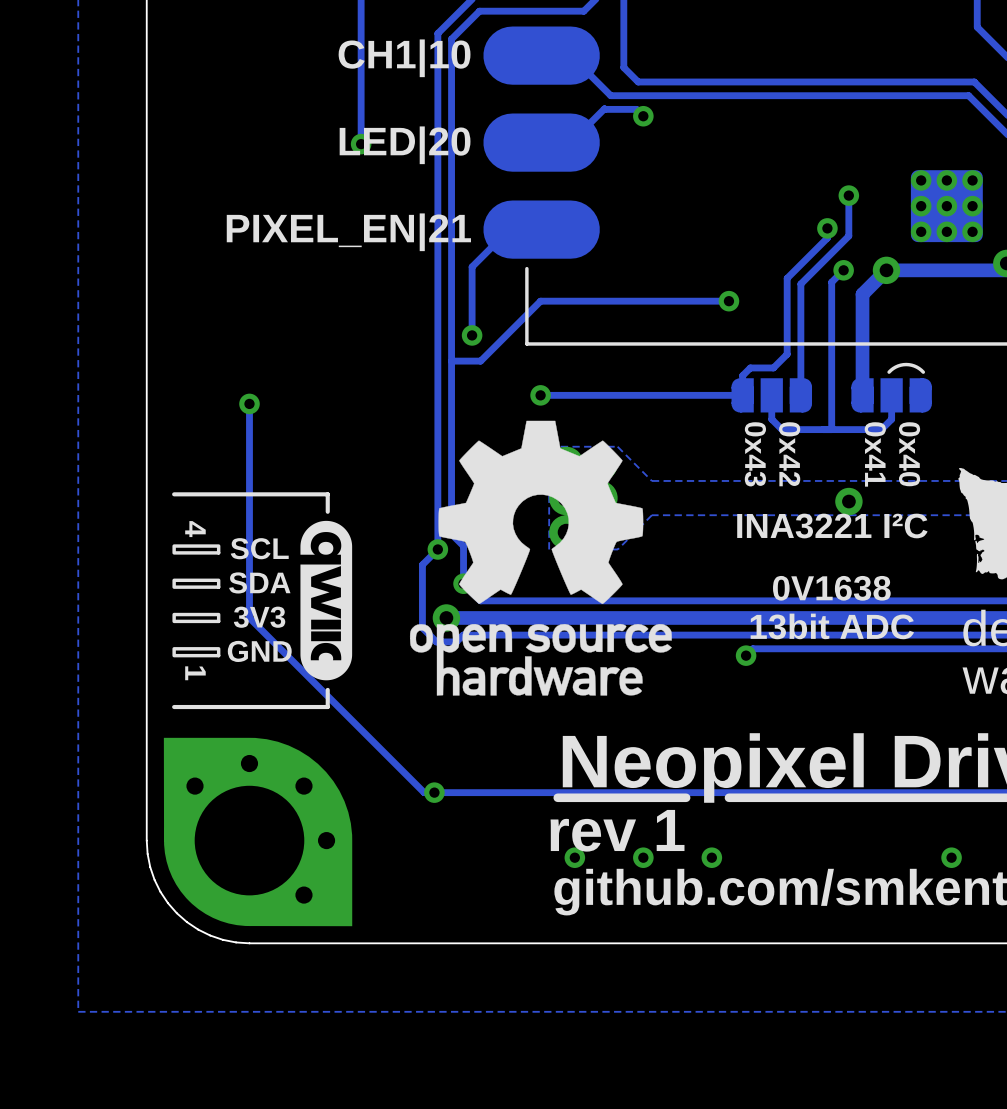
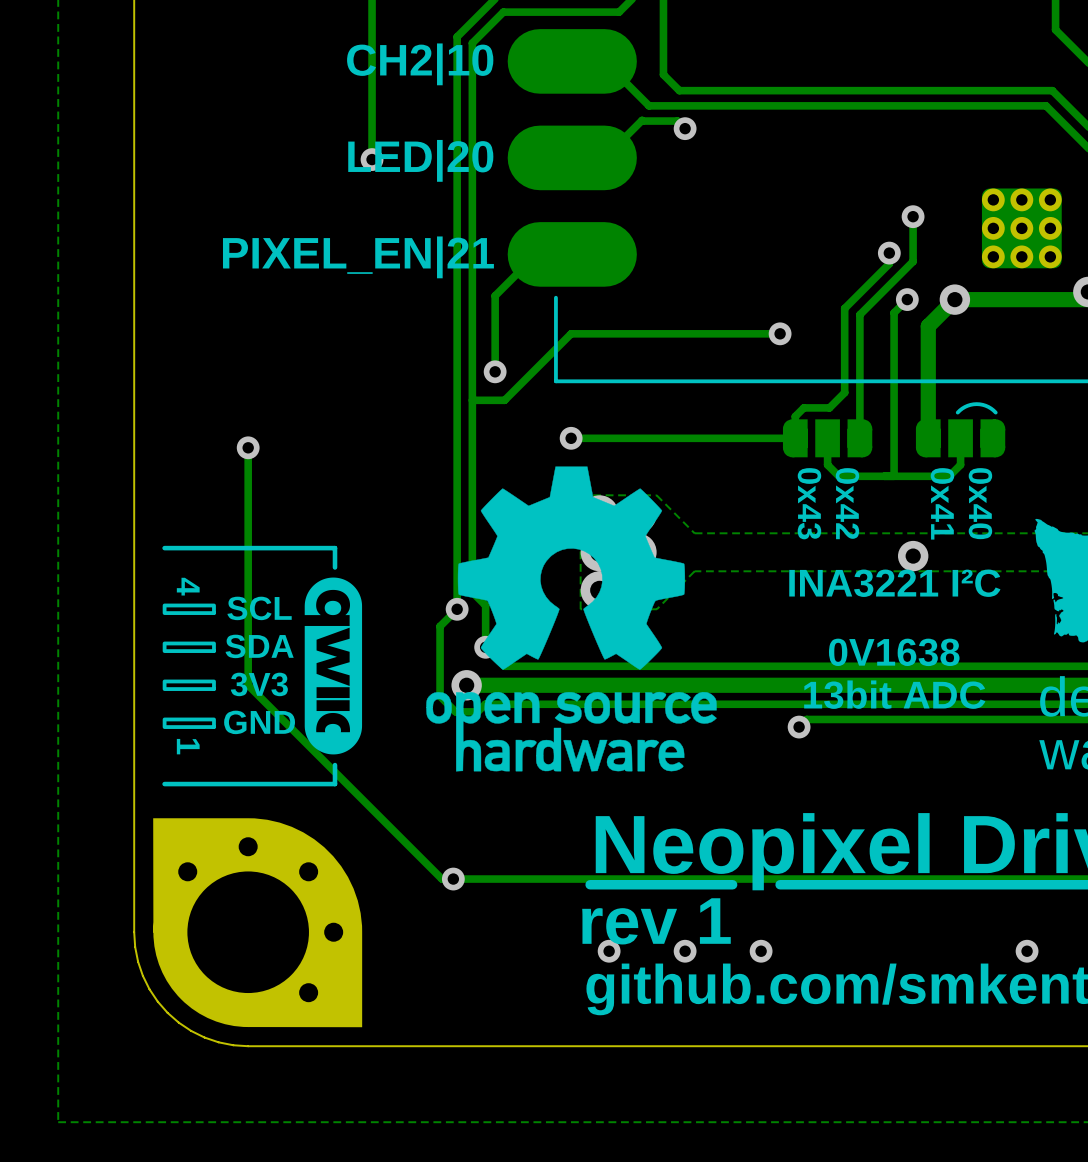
text: CH1|10 (404, 58) -> CH2|10 (420, 64)

